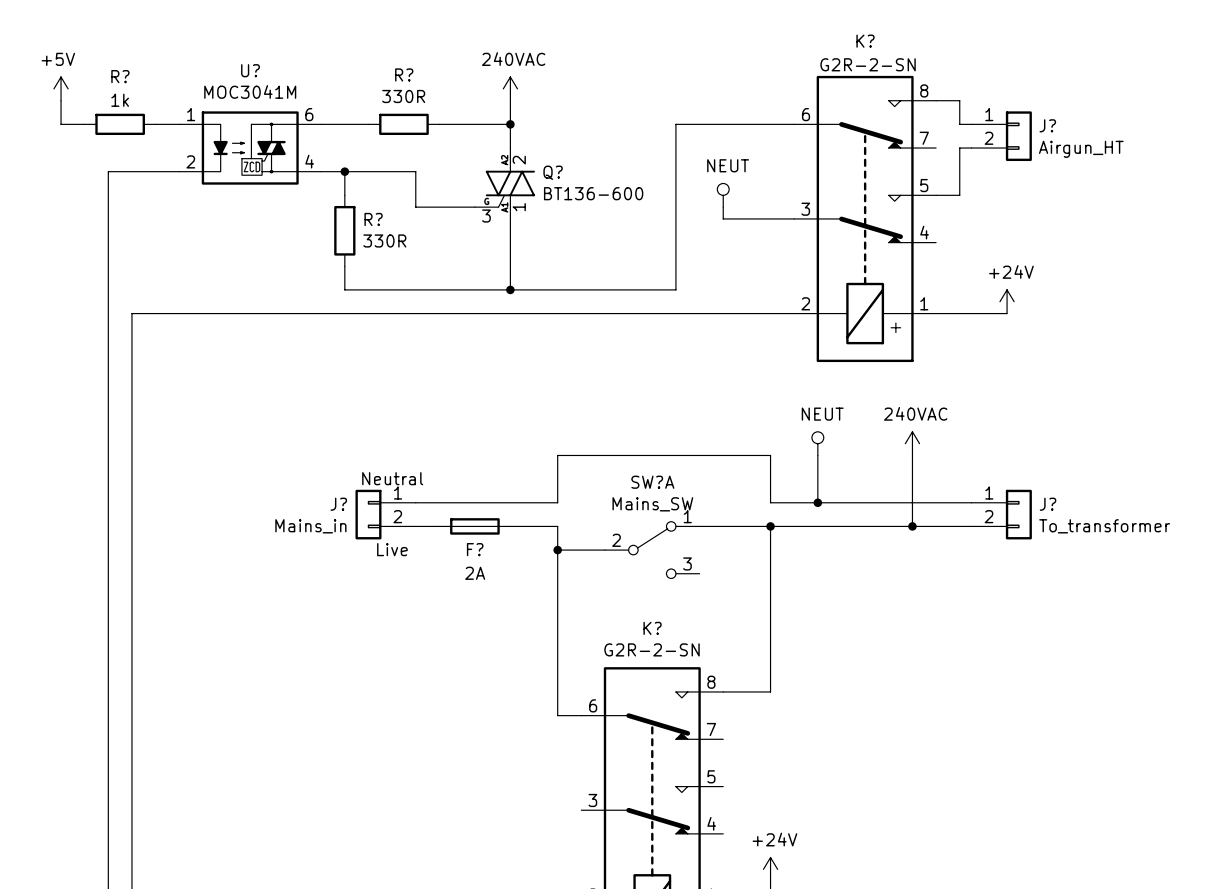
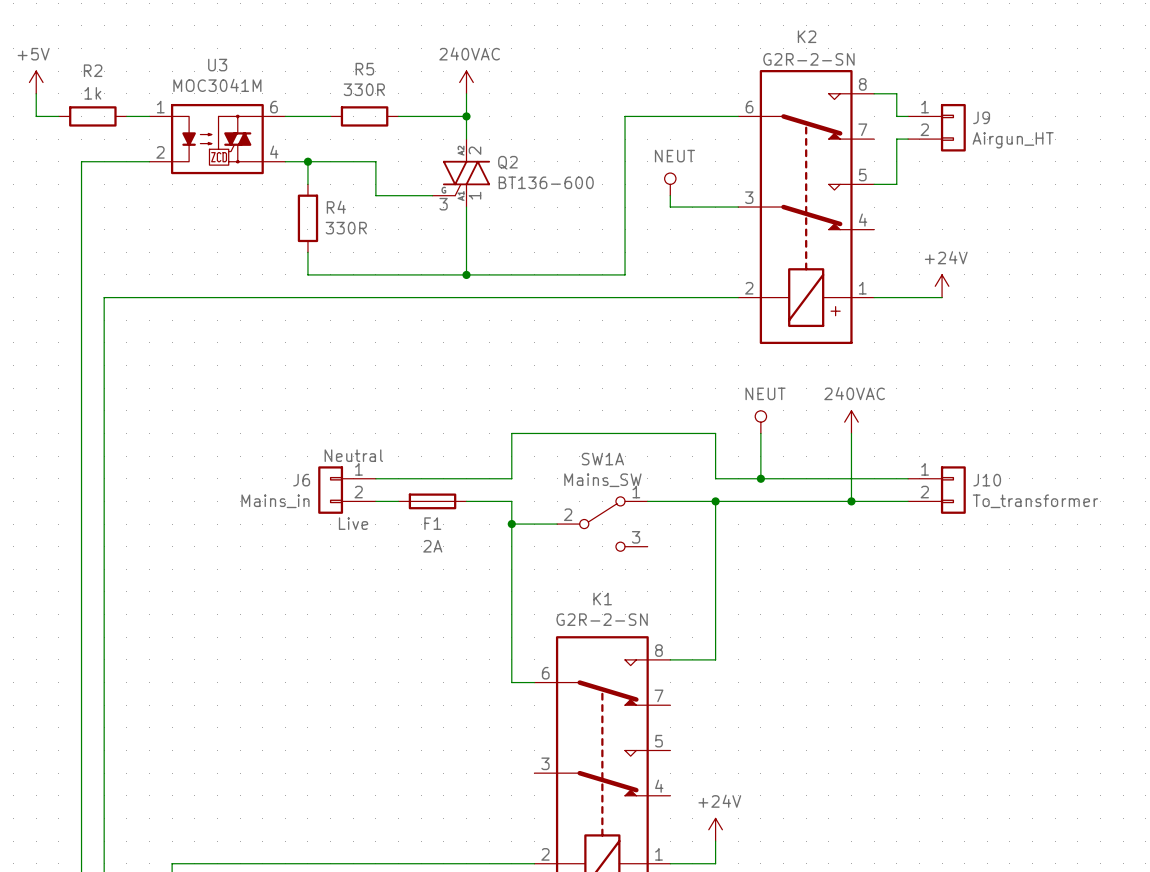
K? name: K? (865, 41) -> K2 (807, 36)
U? name: U? (250, 70) -> U3 (217, 65)
R? name: R? (404, 74) -> R5 (364, 69)
R? name: R? (120, 76) -> R2 (93, 70)
J? name: J? (1047, 125) -> J9 (981, 117)
Q? name: Q? (553, 172) -> Q2 (507, 162)
R? name: R? (373, 219) -> R4 (336, 207)
SW?A name: SW?A (652, 482) -> SW1A (602, 459)
J? name: J? (338, 504) -> J6 (301, 480)
J? name: J? (1048, 504) -> J10 (987, 480)
F? name: F? (475, 549) -> F1 (432, 523)
K? name: K? (652, 628) -> K1 (602, 599)

